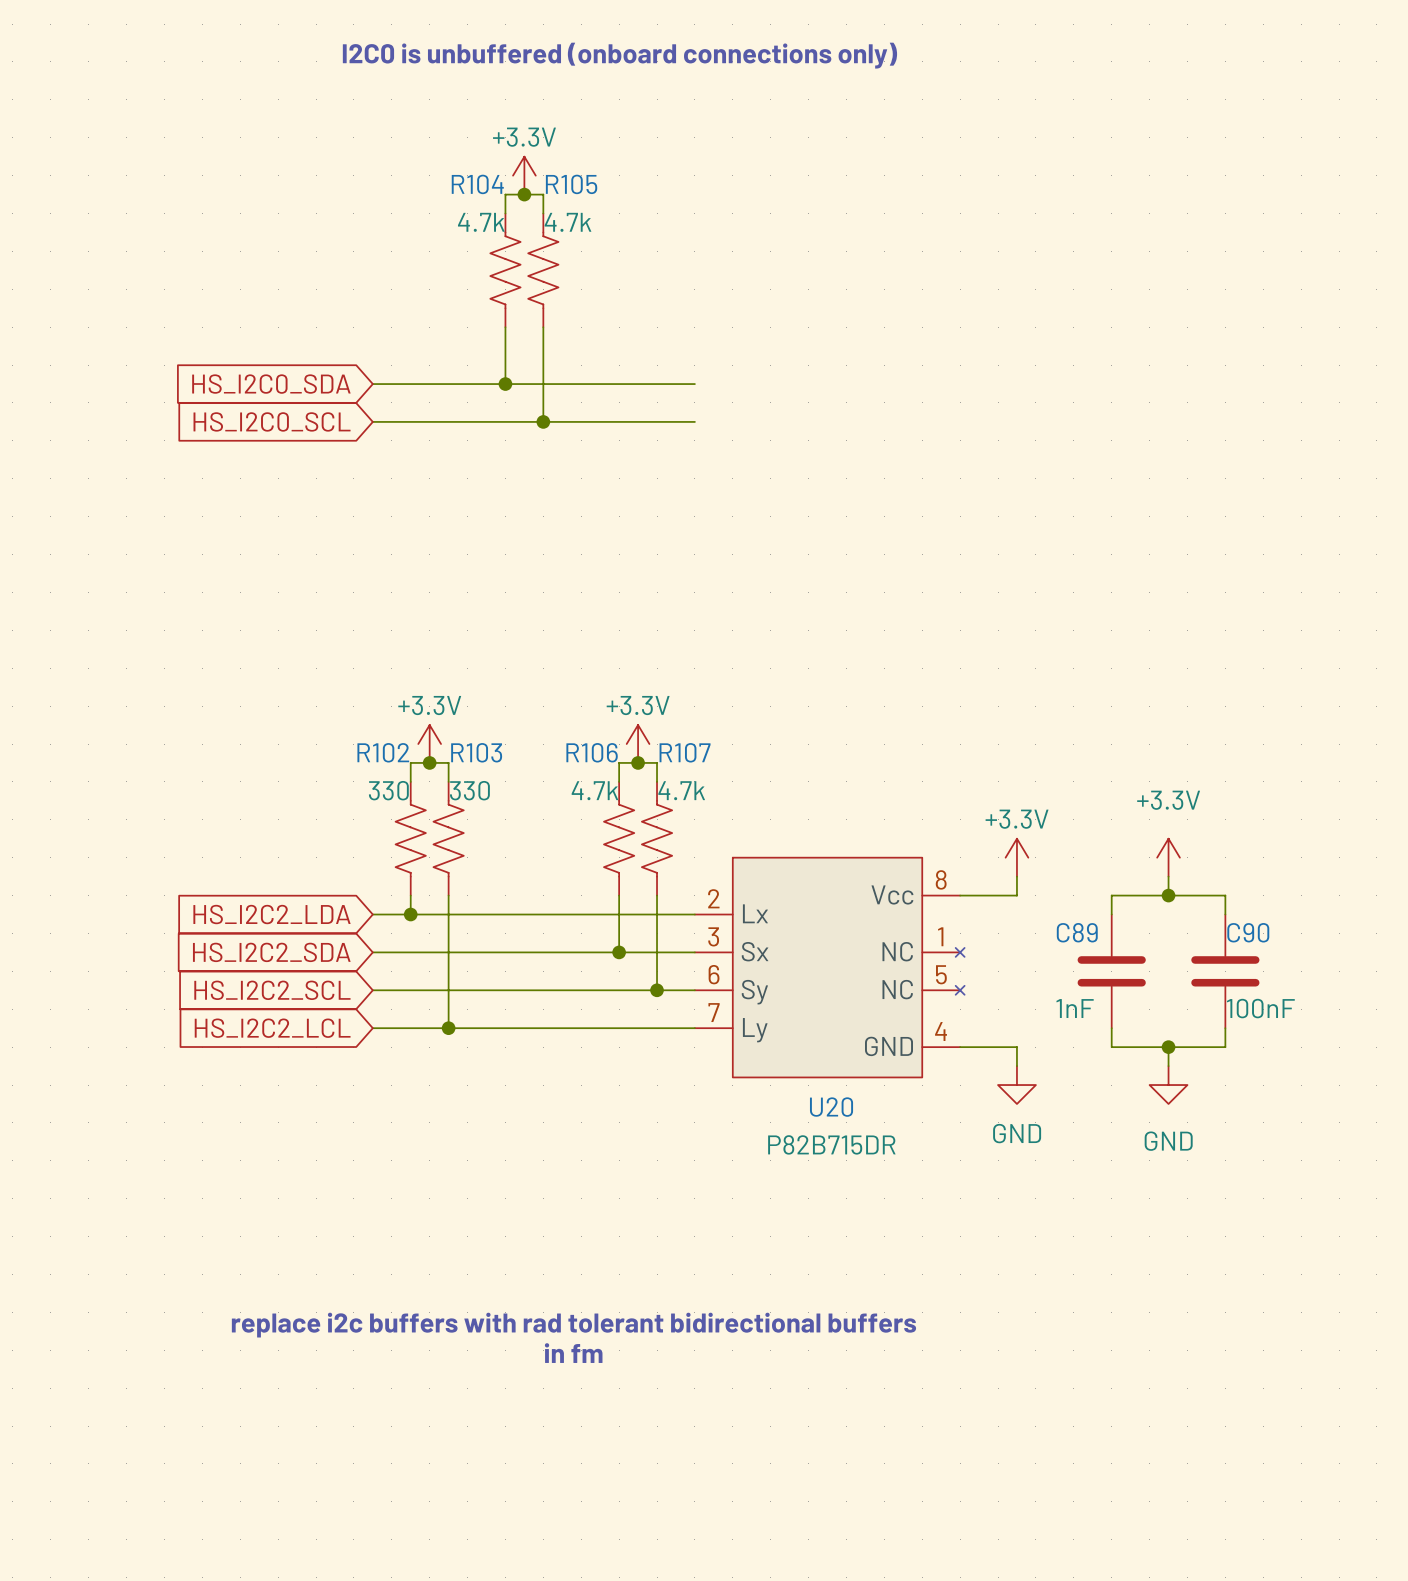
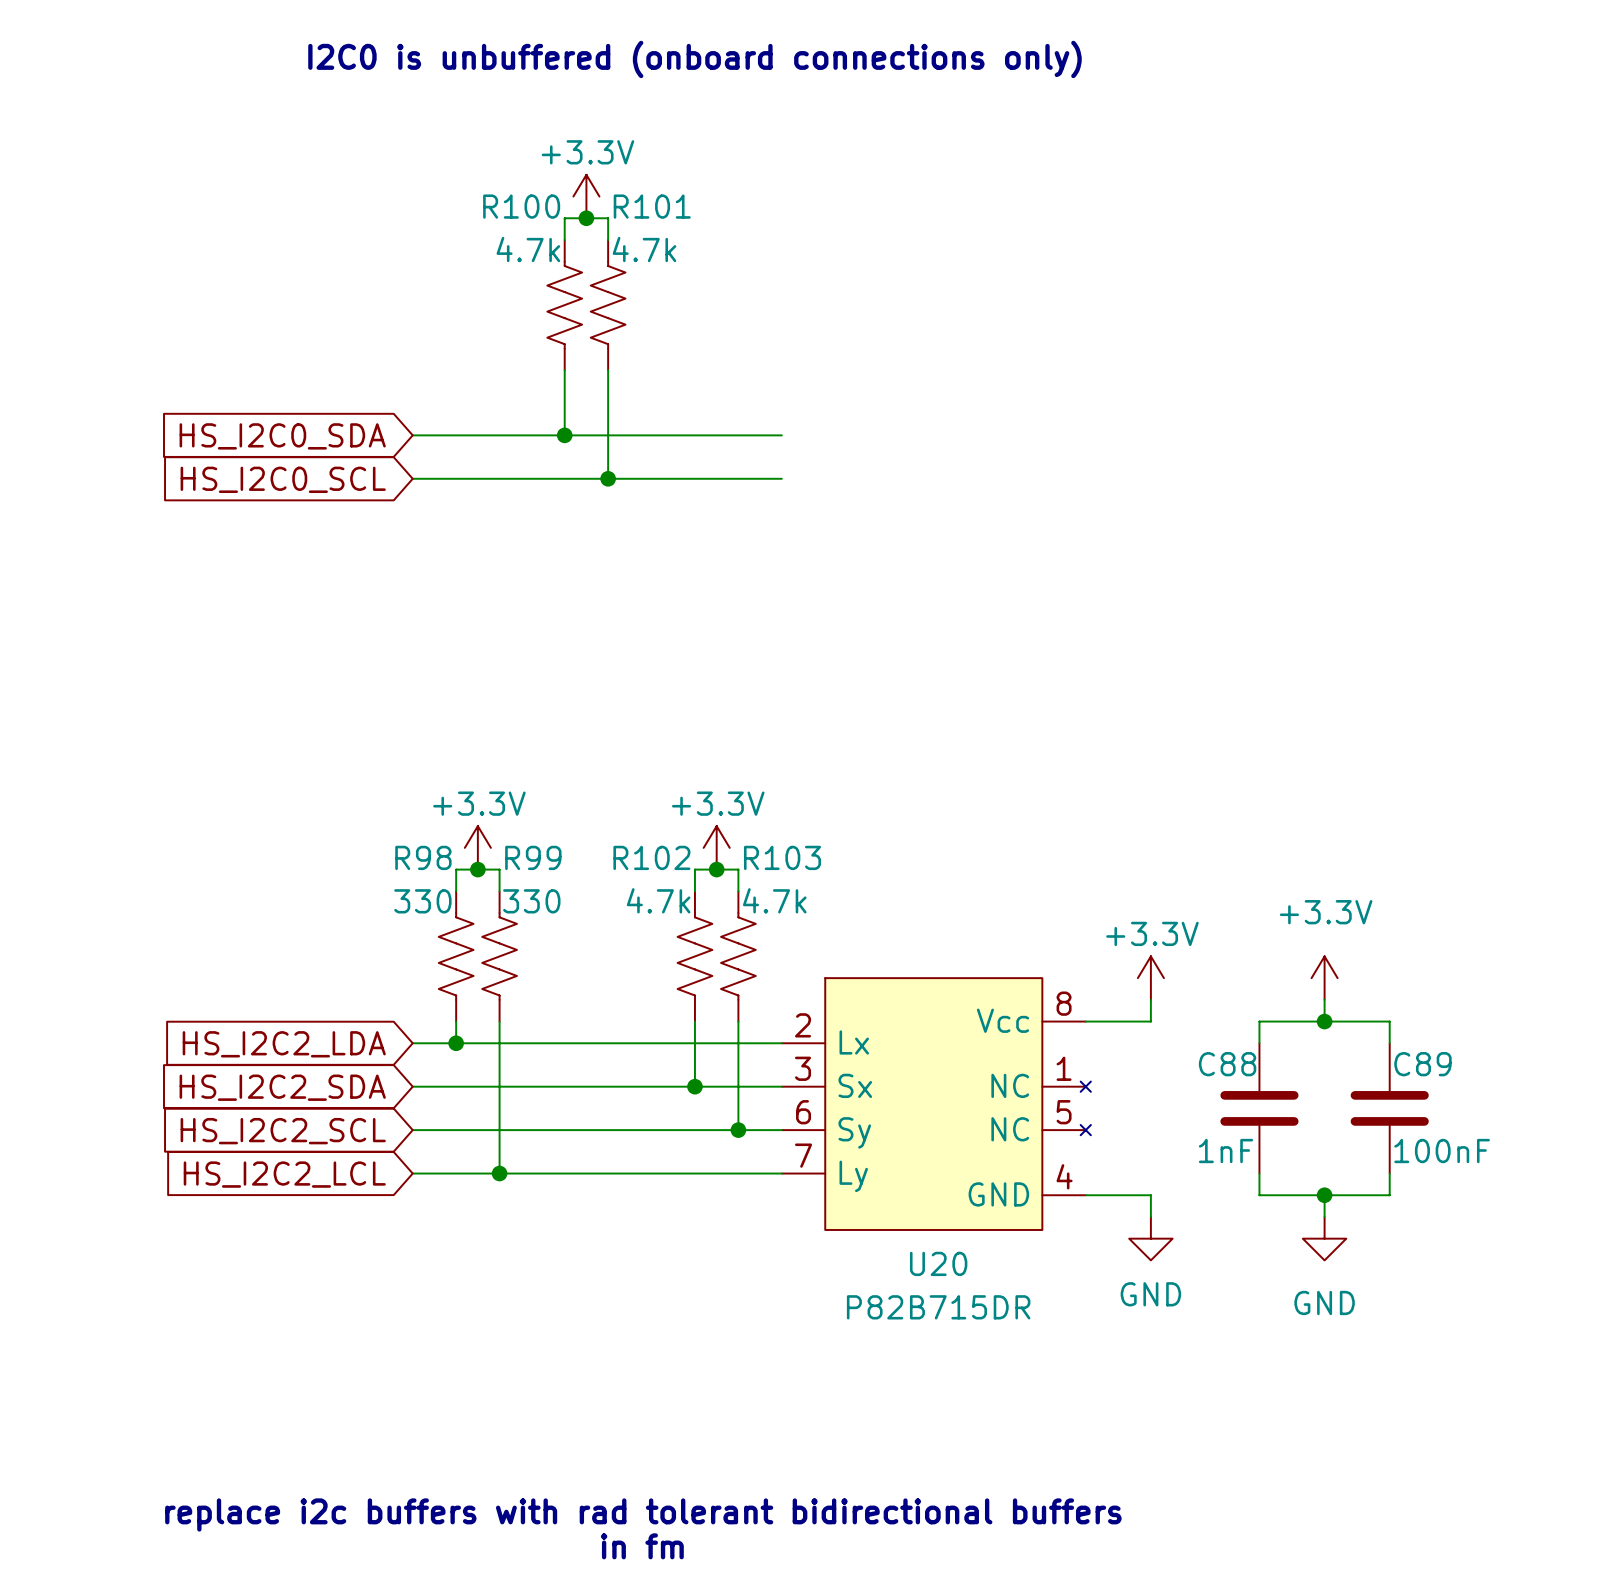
R104 name: R104 (477, 184) -> R100 (521, 206)
R105 name: R105 (571, 184) -> R101 (652, 206)
R102 name: R102 (383, 752) -> R98 (423, 857)
R103 name: R103 (476, 752) -> R99 (533, 857)
R106 name: R106 (592, 752) -> R102 (651, 857)
R107 name: R107 (685, 752) -> R103 (782, 857)
C89 name: C89 (1077, 932) -> C88 (1227, 1064)
C90 name: C90 (1248, 932) -> C89 (1422, 1064)

